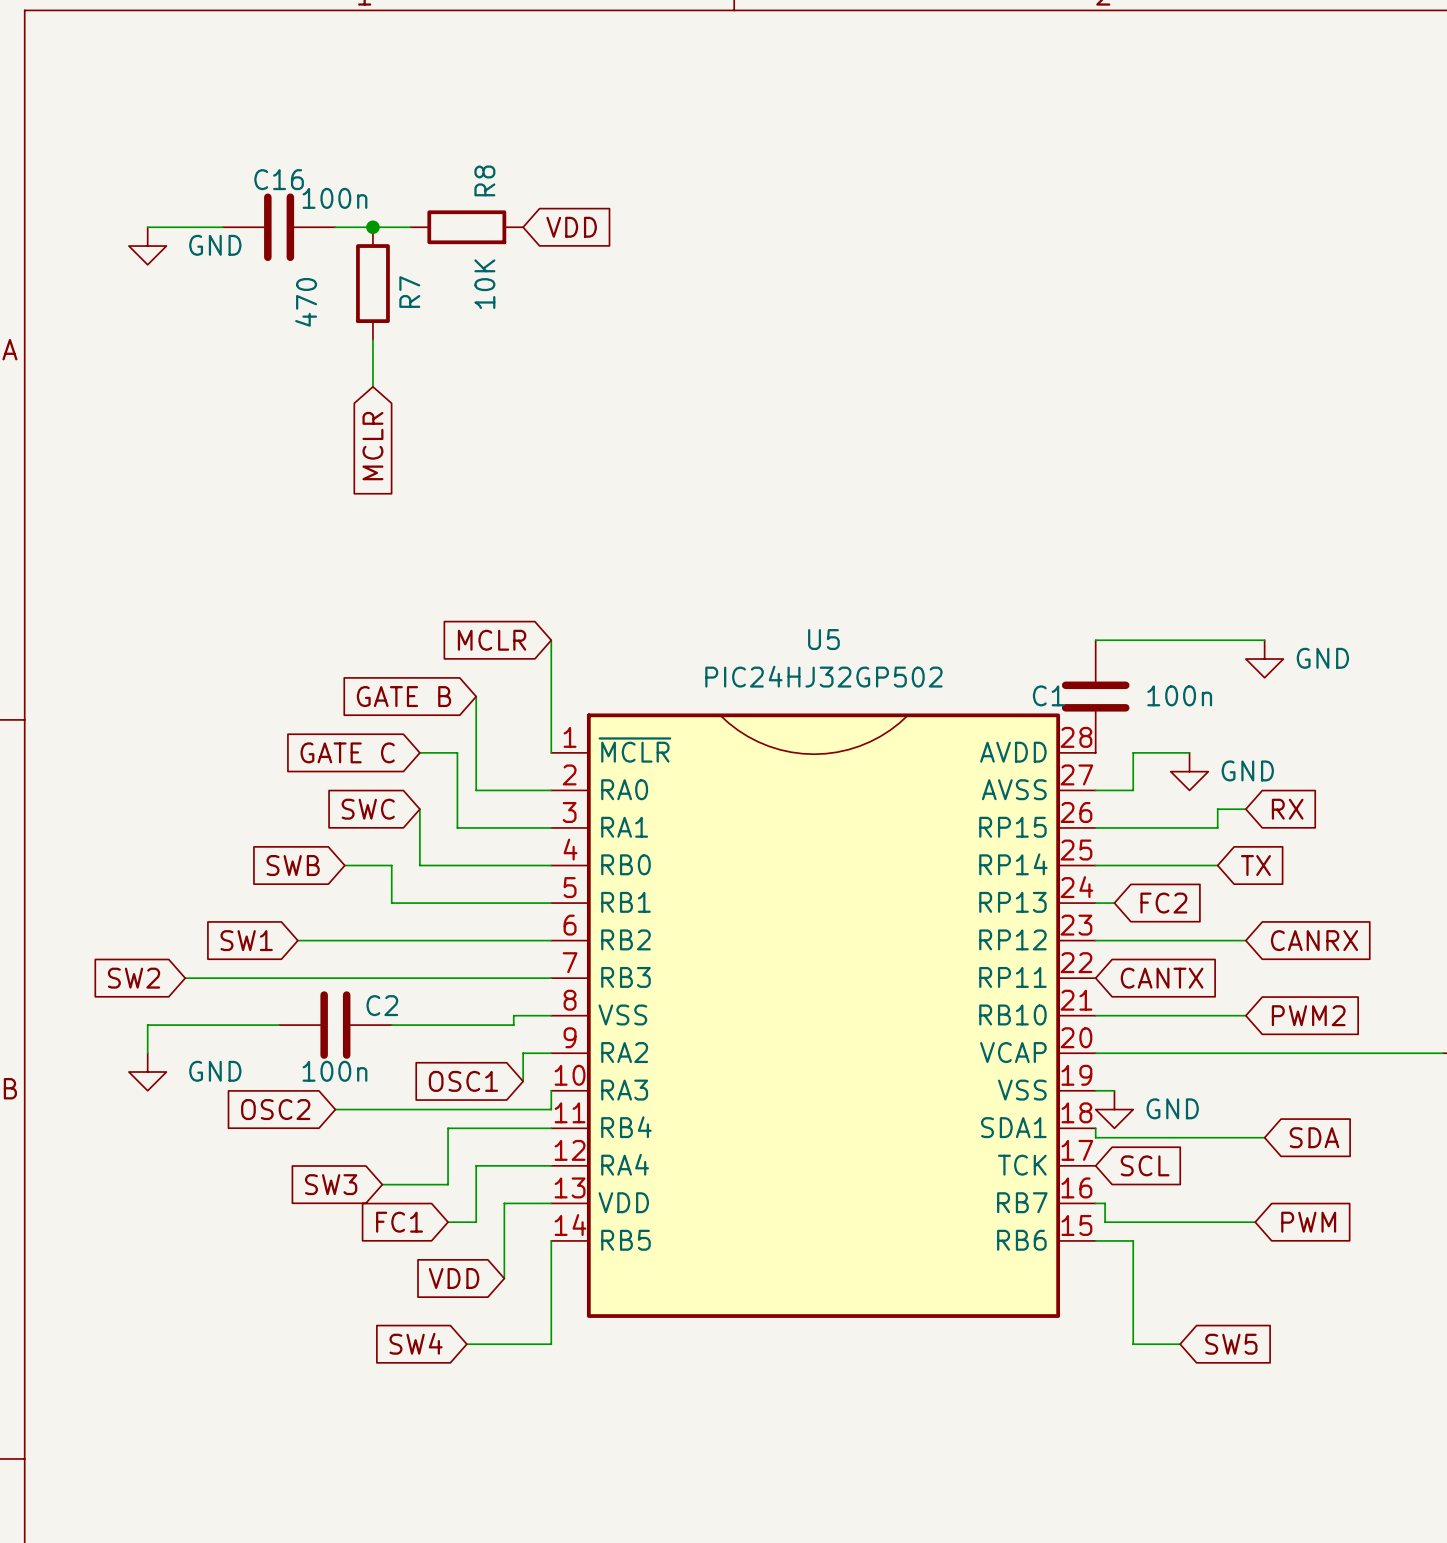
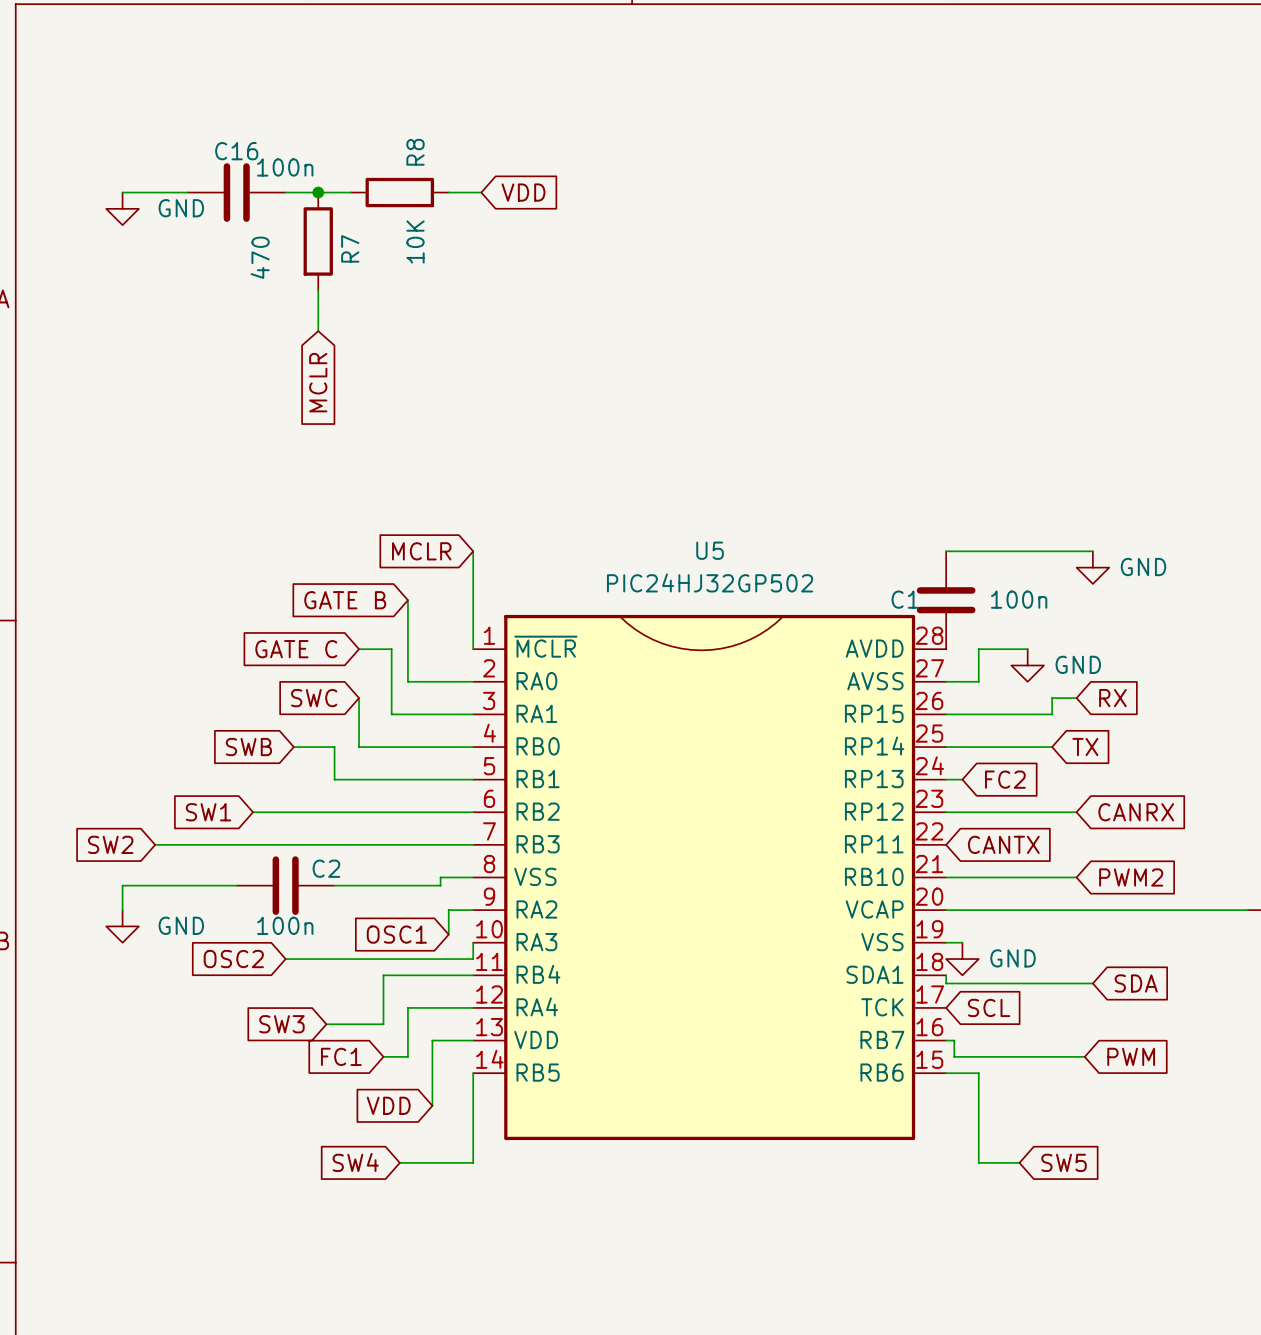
wire: none -> (448, 192) (481, 192)
global label position: VDD (571, 227) -> VDD (523, 192)

